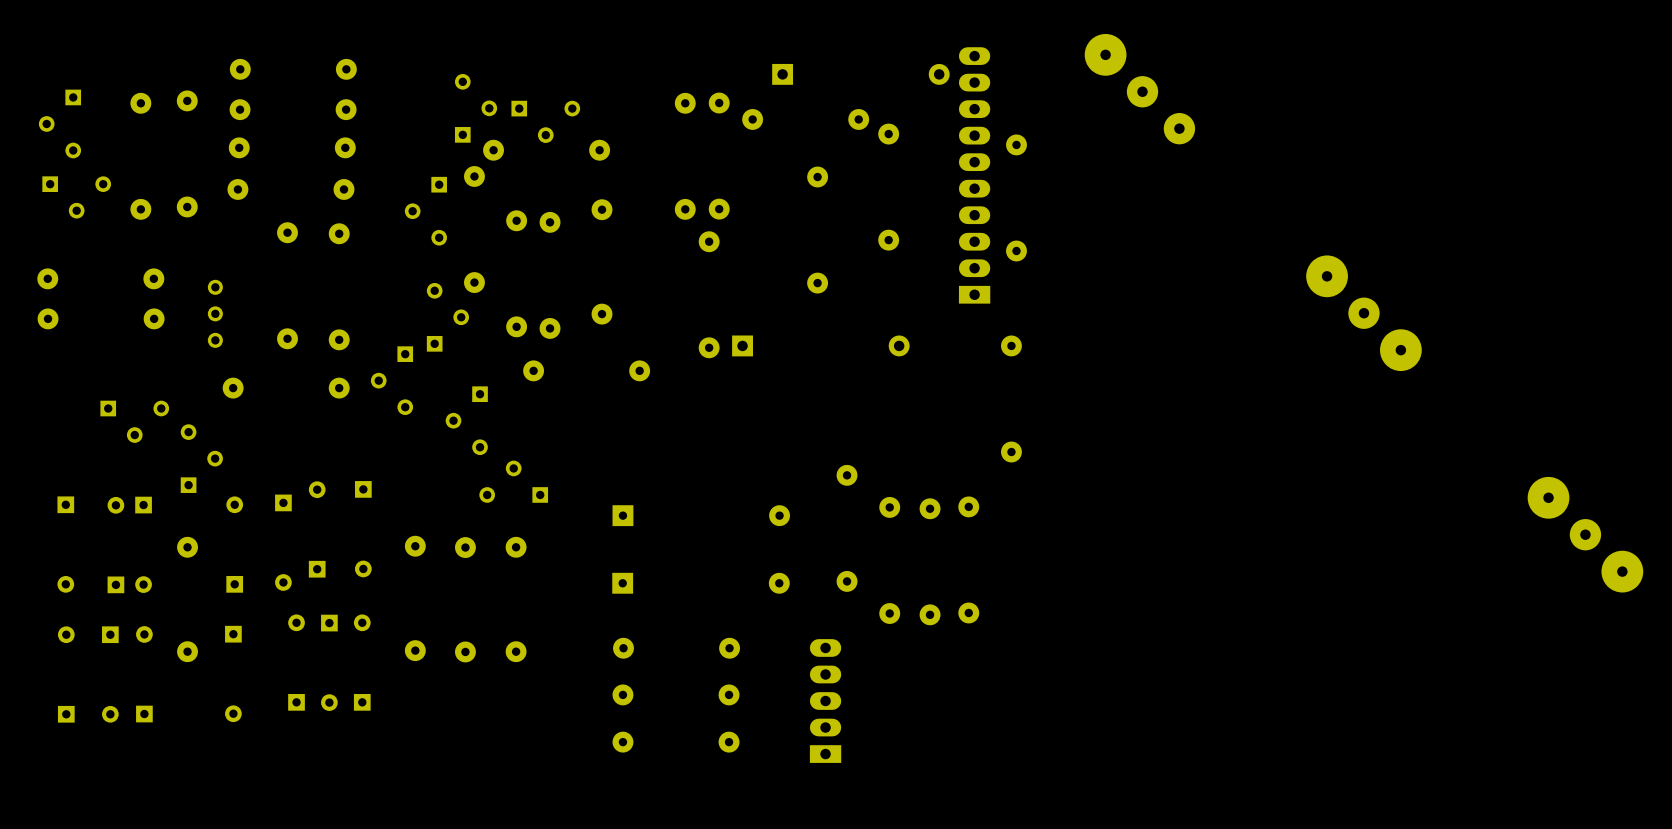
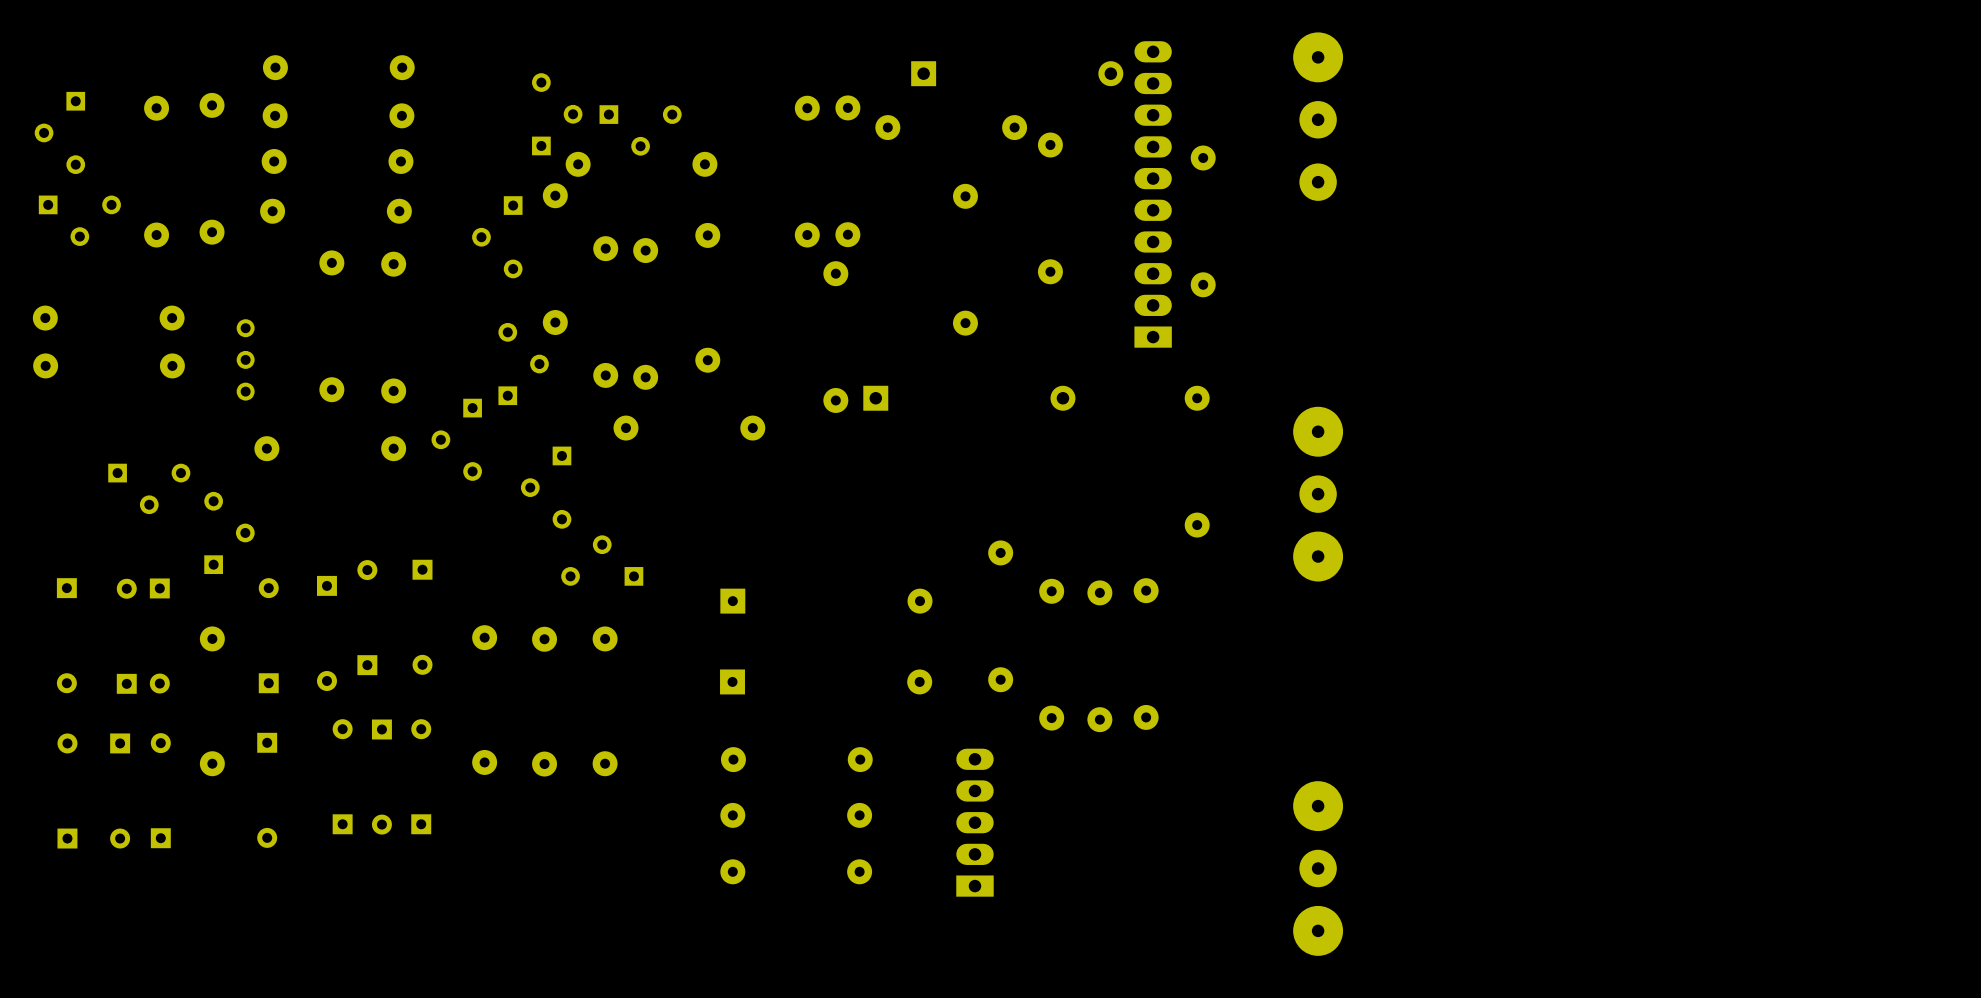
part: (1139, 89) -> none
part: none -> (1318, 116)
part: (1363, 313) -> none
part: none -> (1318, 494)
part: (1585, 534) -> none
part: none -> (1318, 868)

